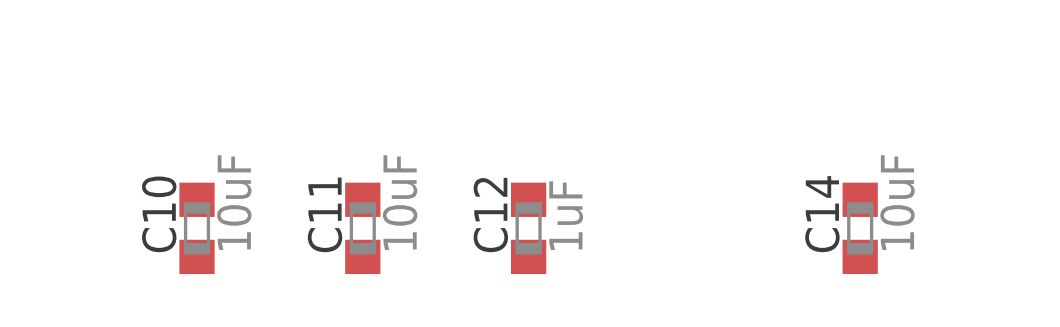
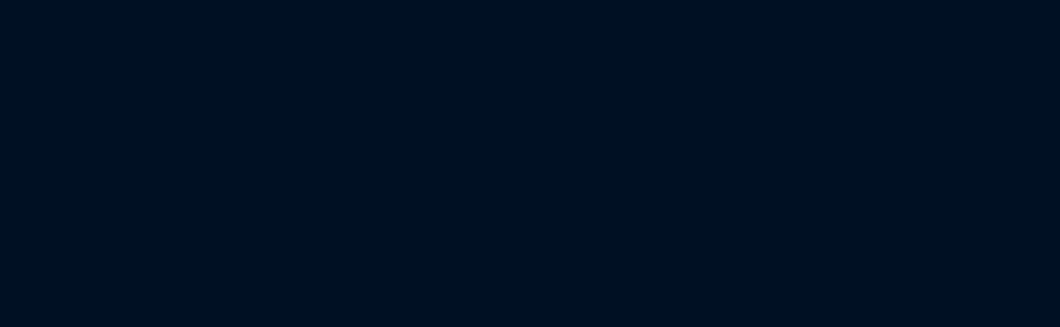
C10: 10uF (197, 228) -> none
C11: 10uF (362, 228) -> none
C12: 1uF (528, 228) -> none
C14: 10uF (860, 228) -> none

